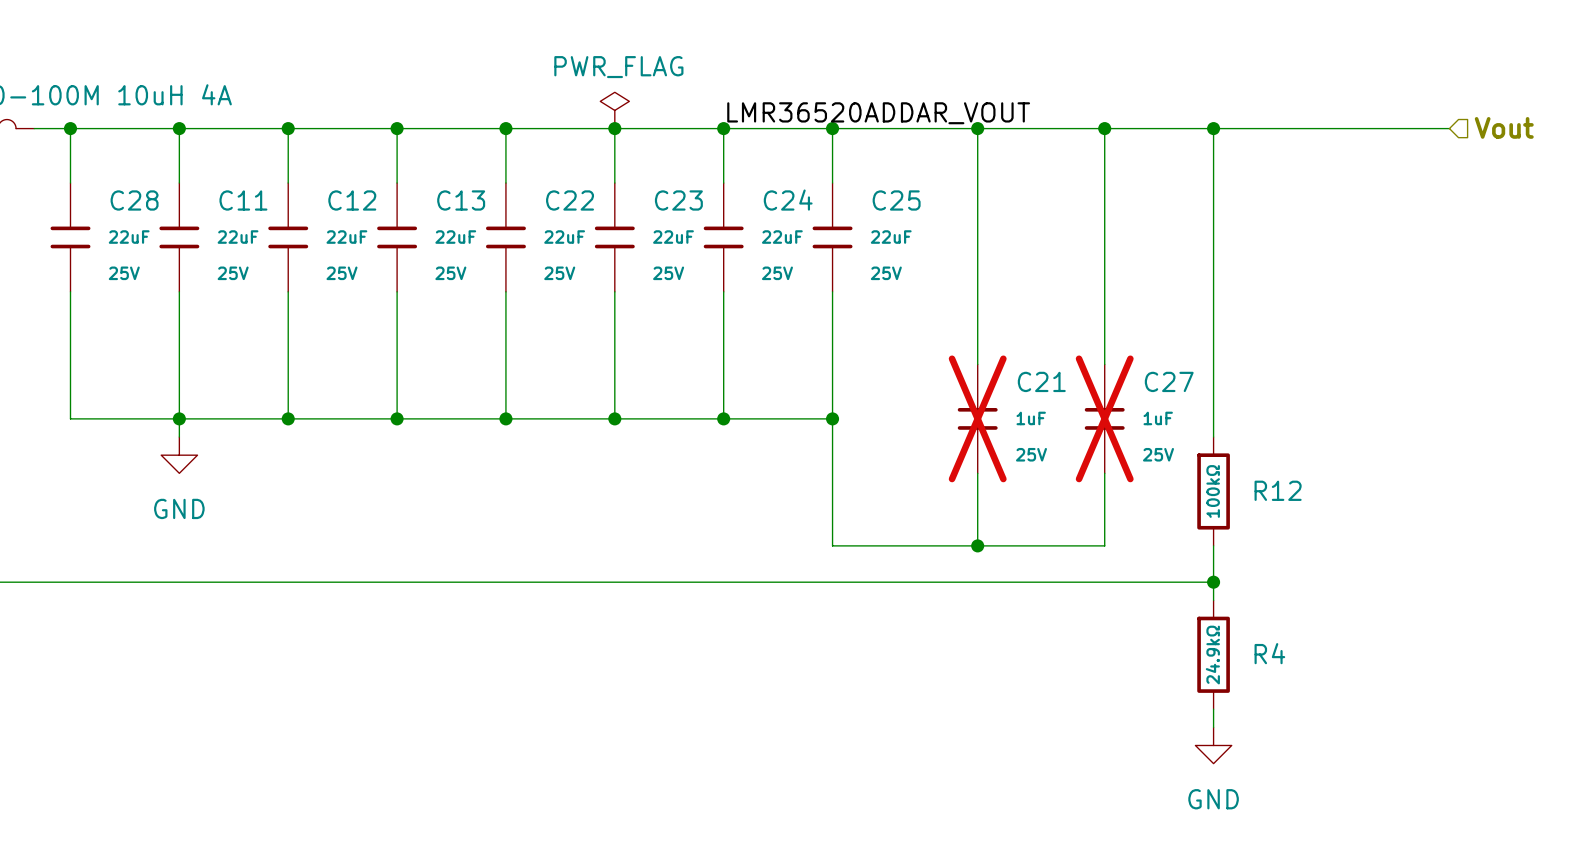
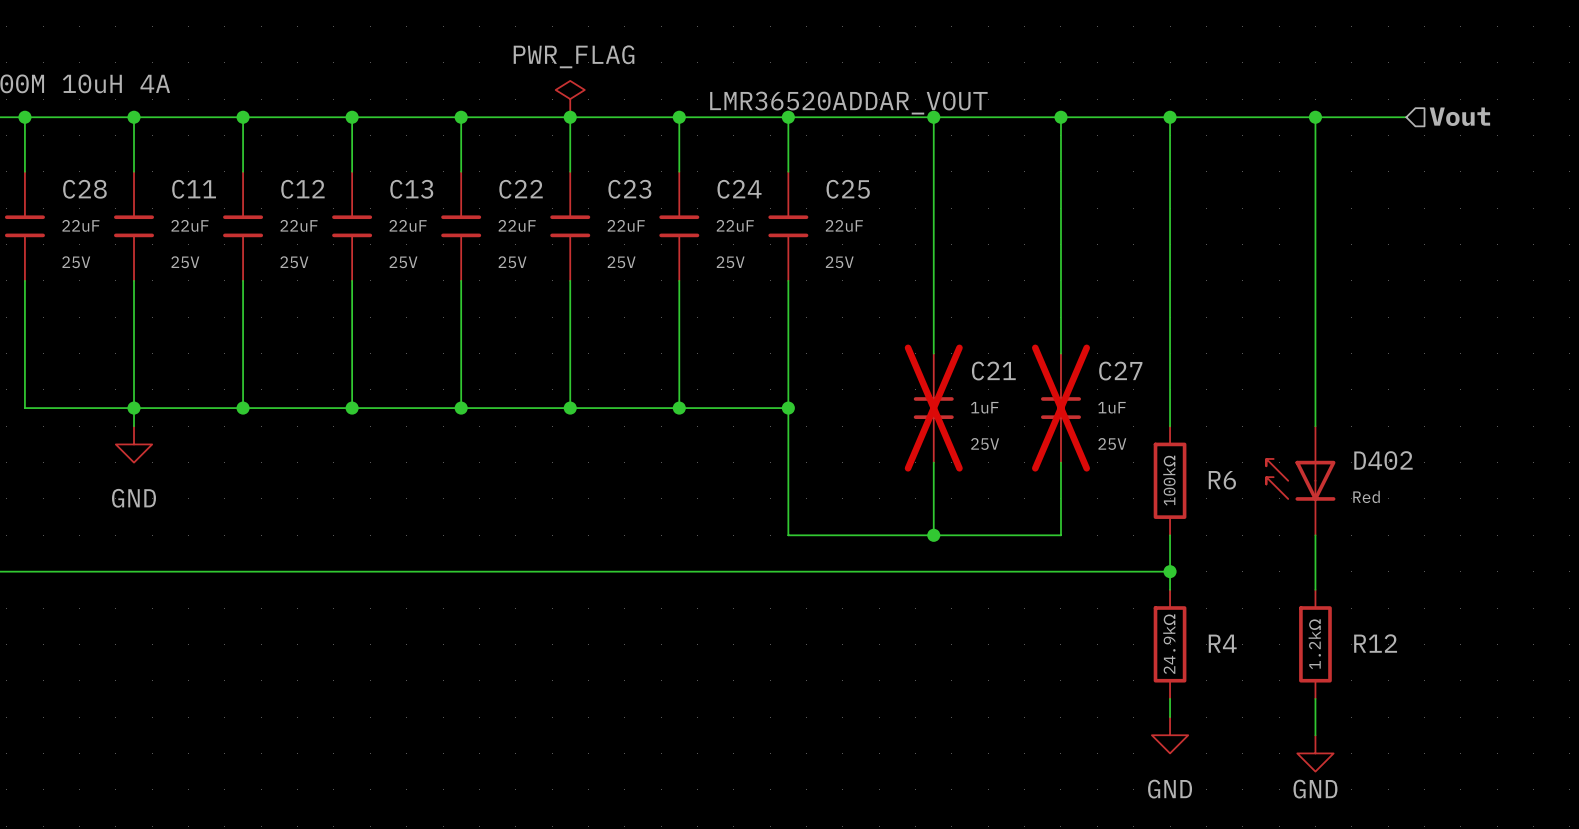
wire: none -> (1315, 117) (1315, 426)
junction: none -> (1315, 117)
R12 name: R12 (1278, 490) -> R6 (1222, 480)
D402: none -> Red (1300, 480)
wire: none -> (1315, 535) (1315, 589)
R12: none -> 1.2kΩ (1315, 644)
wire: none -> (1315, 698) (1315, 735)
power symbol: none -> GND (1315, 753)

